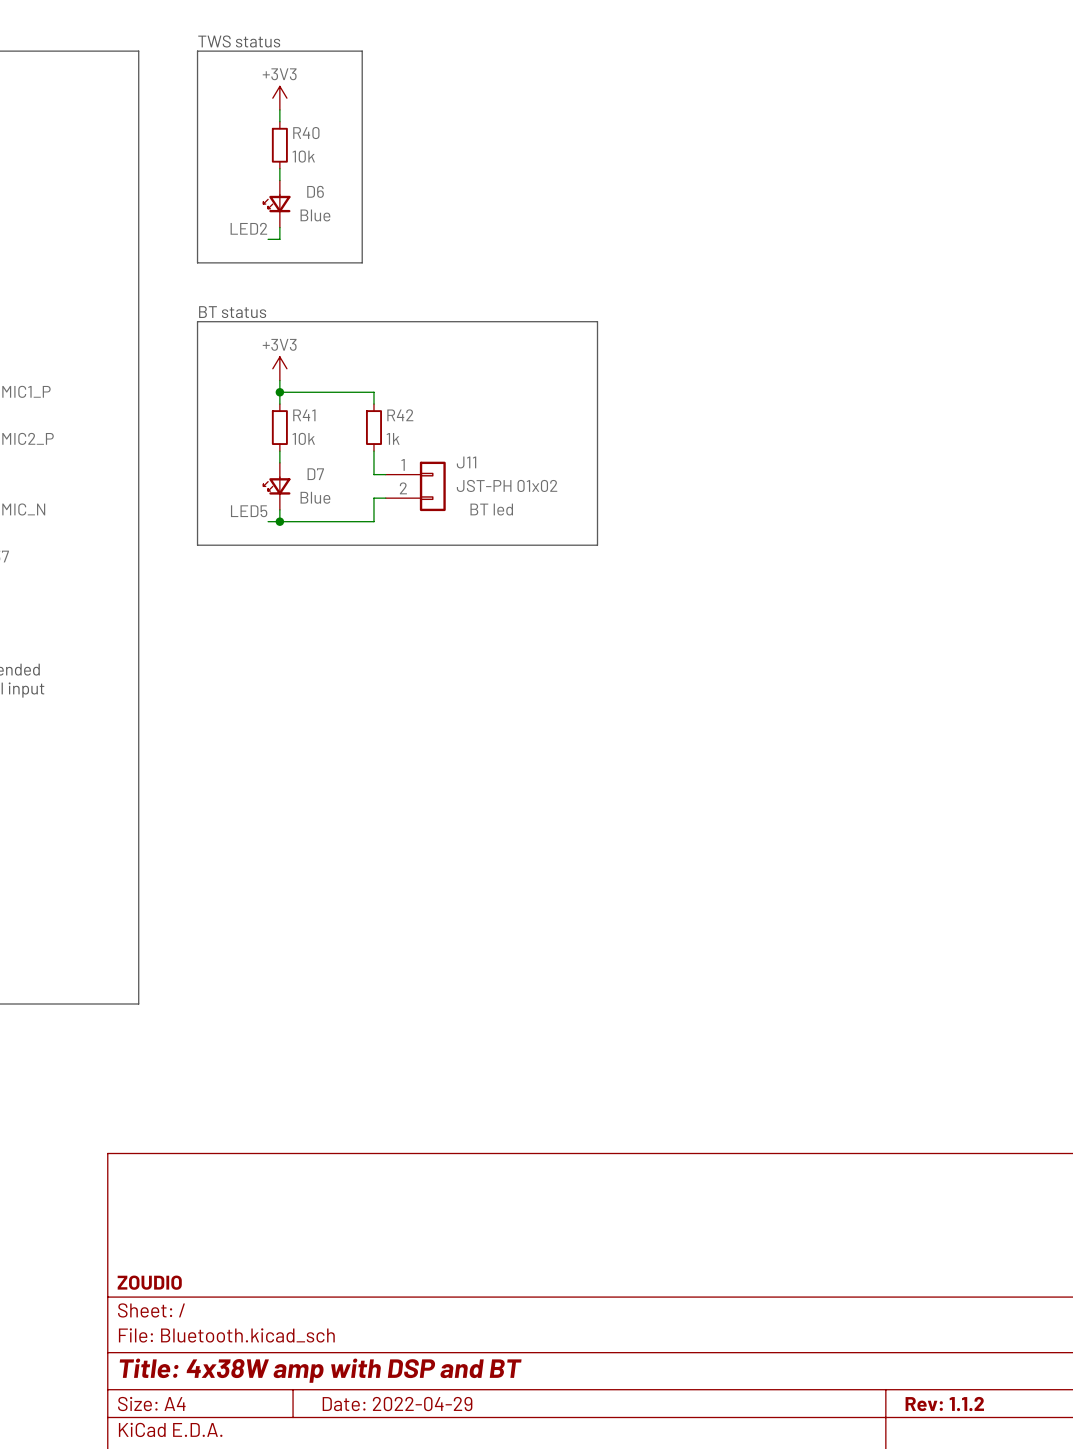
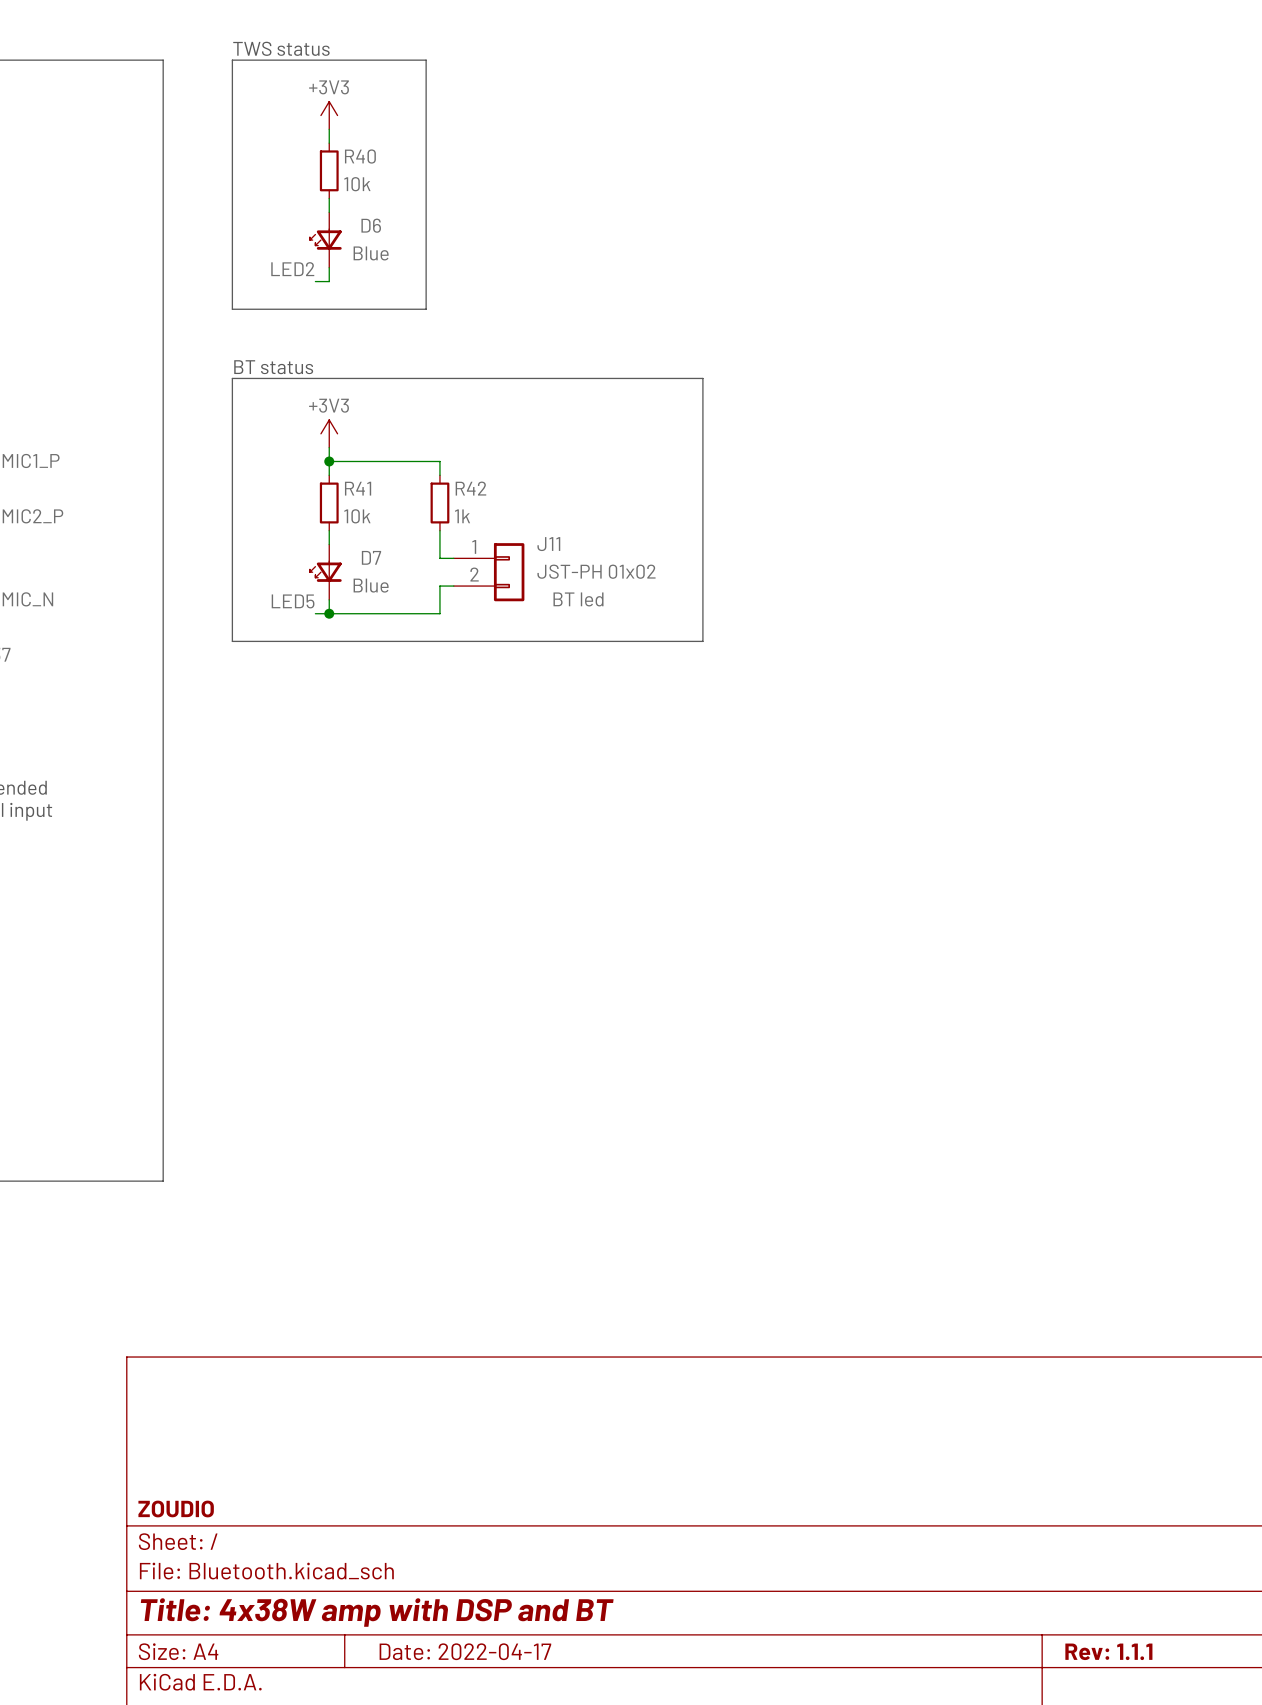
title block: Date: 2022-04-29 (397, 1404) -> Date: 2022-04-17 (465, 1651)
title block: Rev: 1.1.2 (944, 1404) -> Rev: 1.1.1 (1108, 1651)

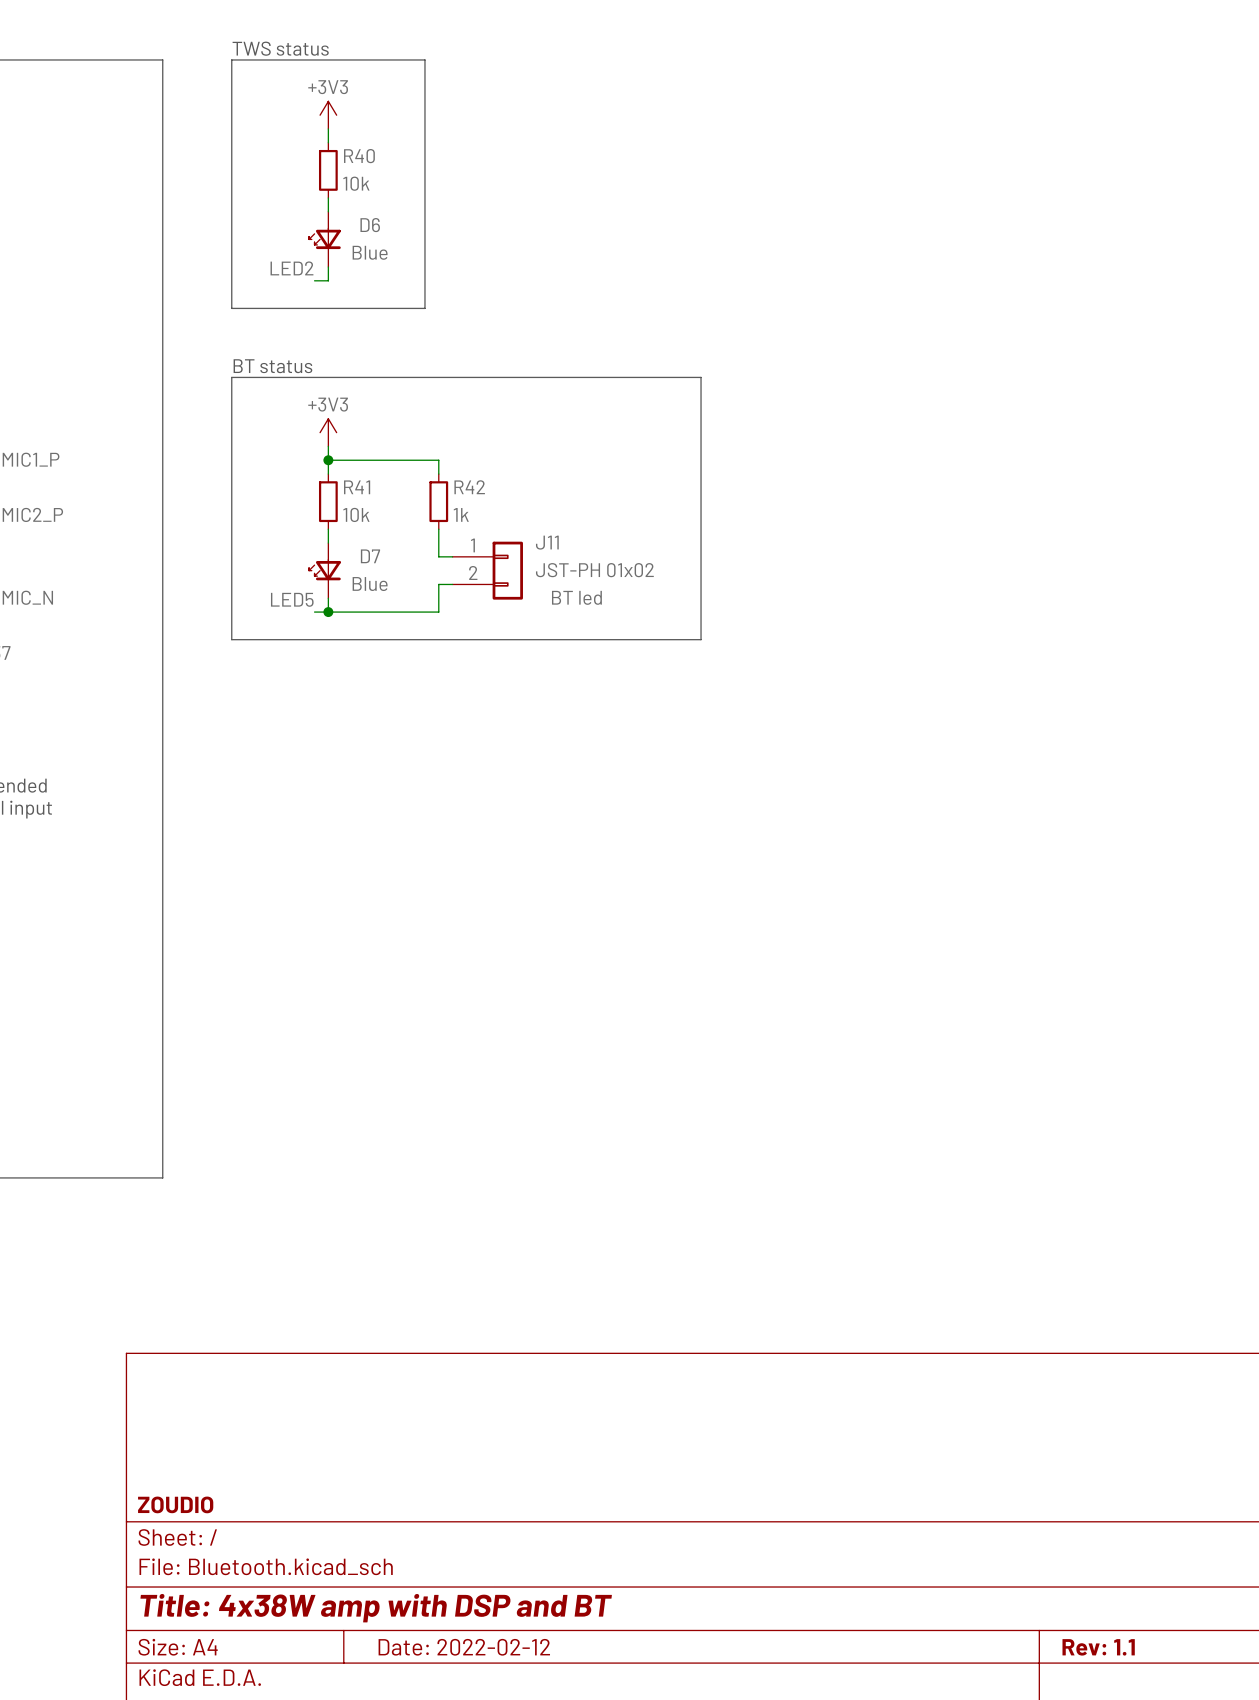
title block: Date: 2022-04-17 (465, 1651) -> Date: 2022-02-12 (464, 1647)
title block: Rev: 1.1.1 (1108, 1651) -> Rev: 1.1 (1098, 1647)

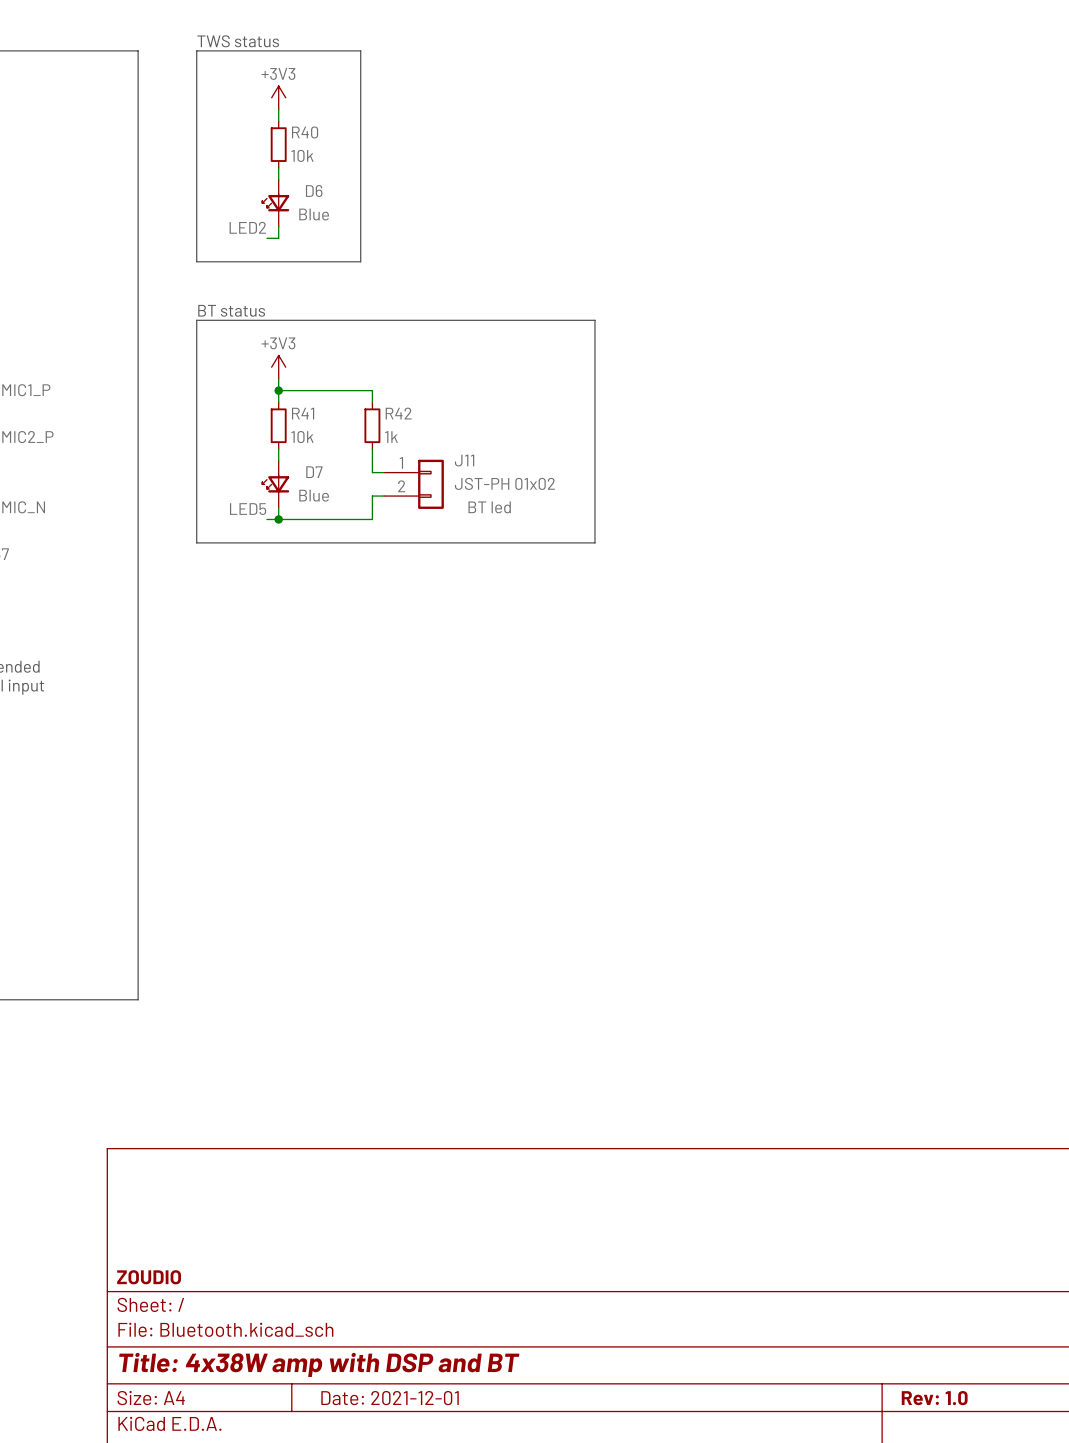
title block: Date: 2022-02-12 (464, 1647) -> Date: 2021-12-01 (390, 1398)
title block: Rev: 1.1 (1098, 1647) -> Rev: 1.0 (934, 1398)

